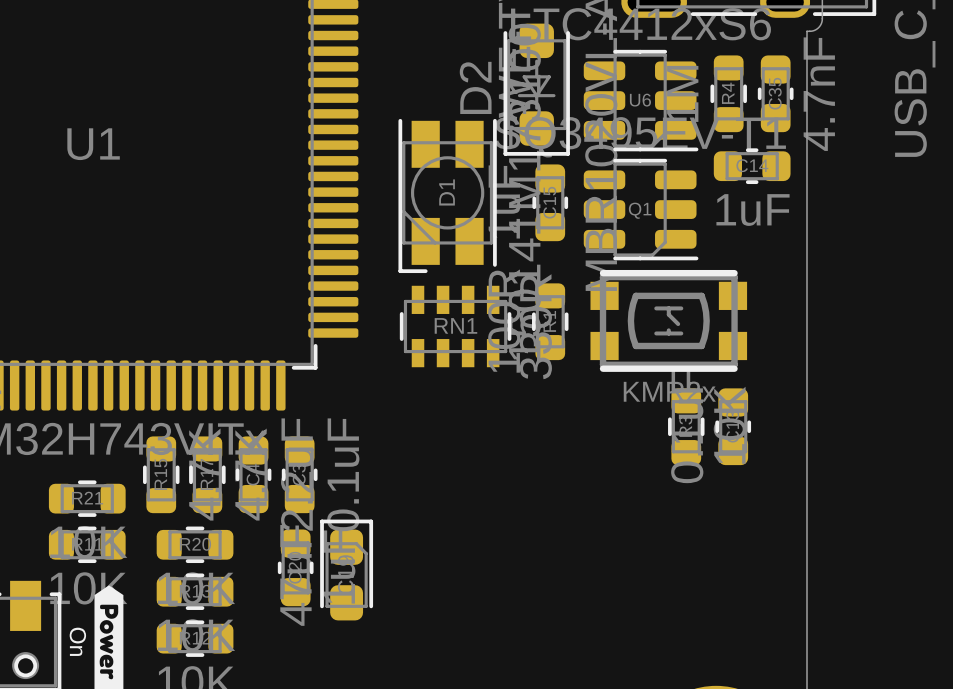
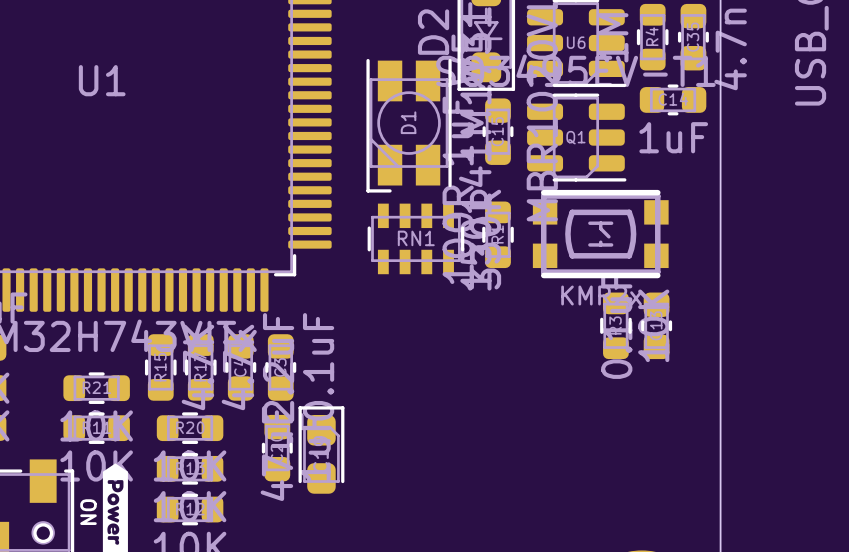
text: On (77, 641) -> ON (88, 512)

